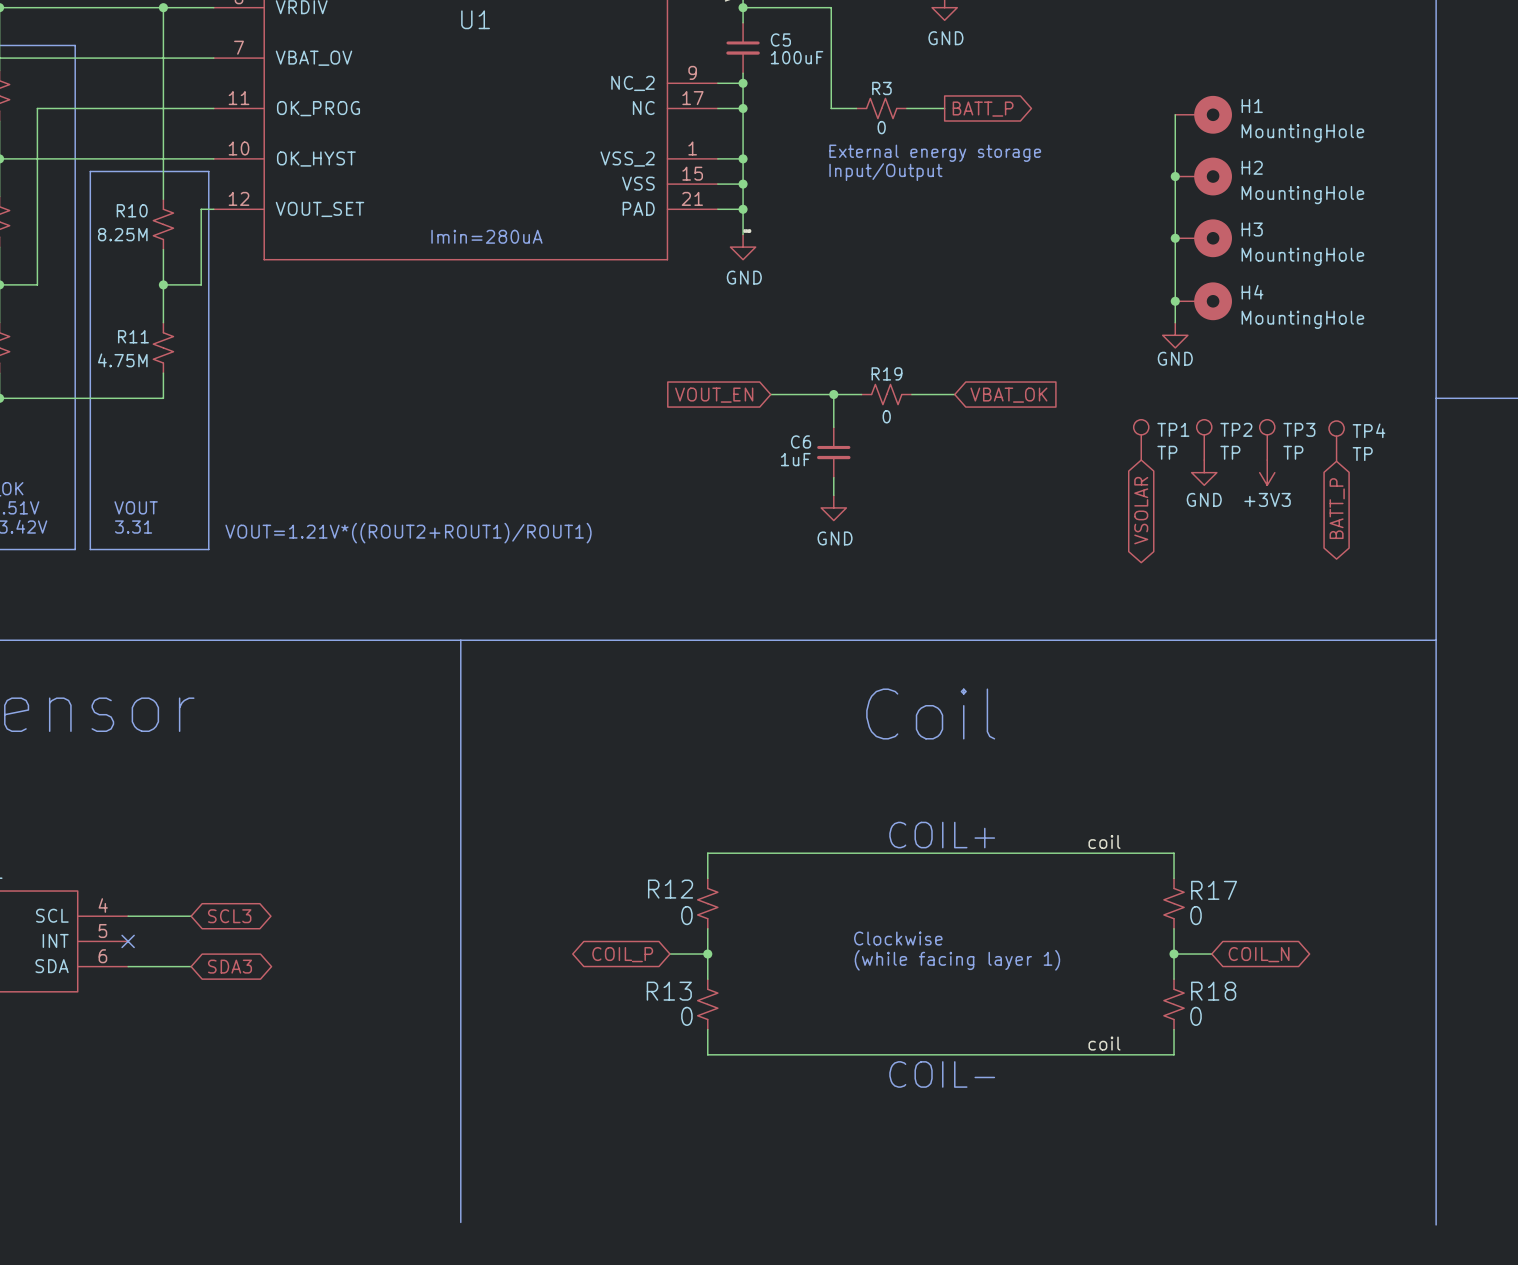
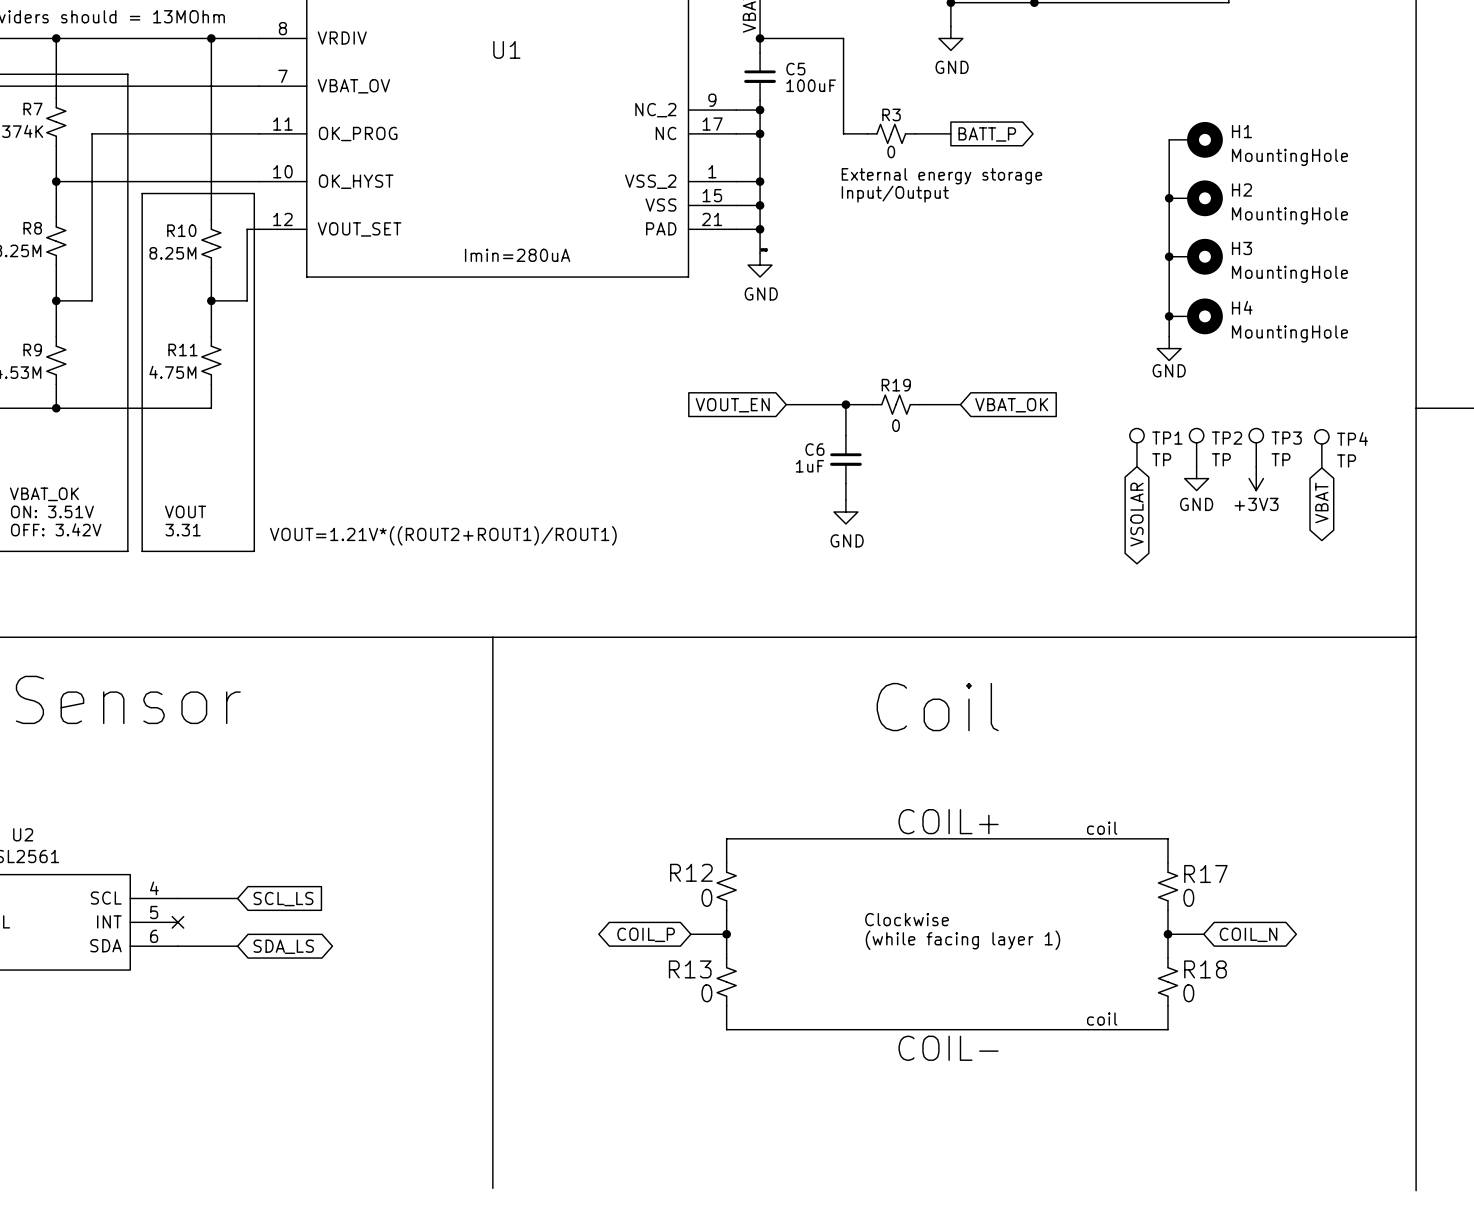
global label: BATT_P (1337, 508) -> VBAT (1321, 502)
global label shape: bidirectional (229, 916) -> input (283, 899)
global label: SCL3 (229, 916) -> SCL_LS (283, 899)
global label: SDA3 (230, 966) -> SDA_LS (283, 946)

